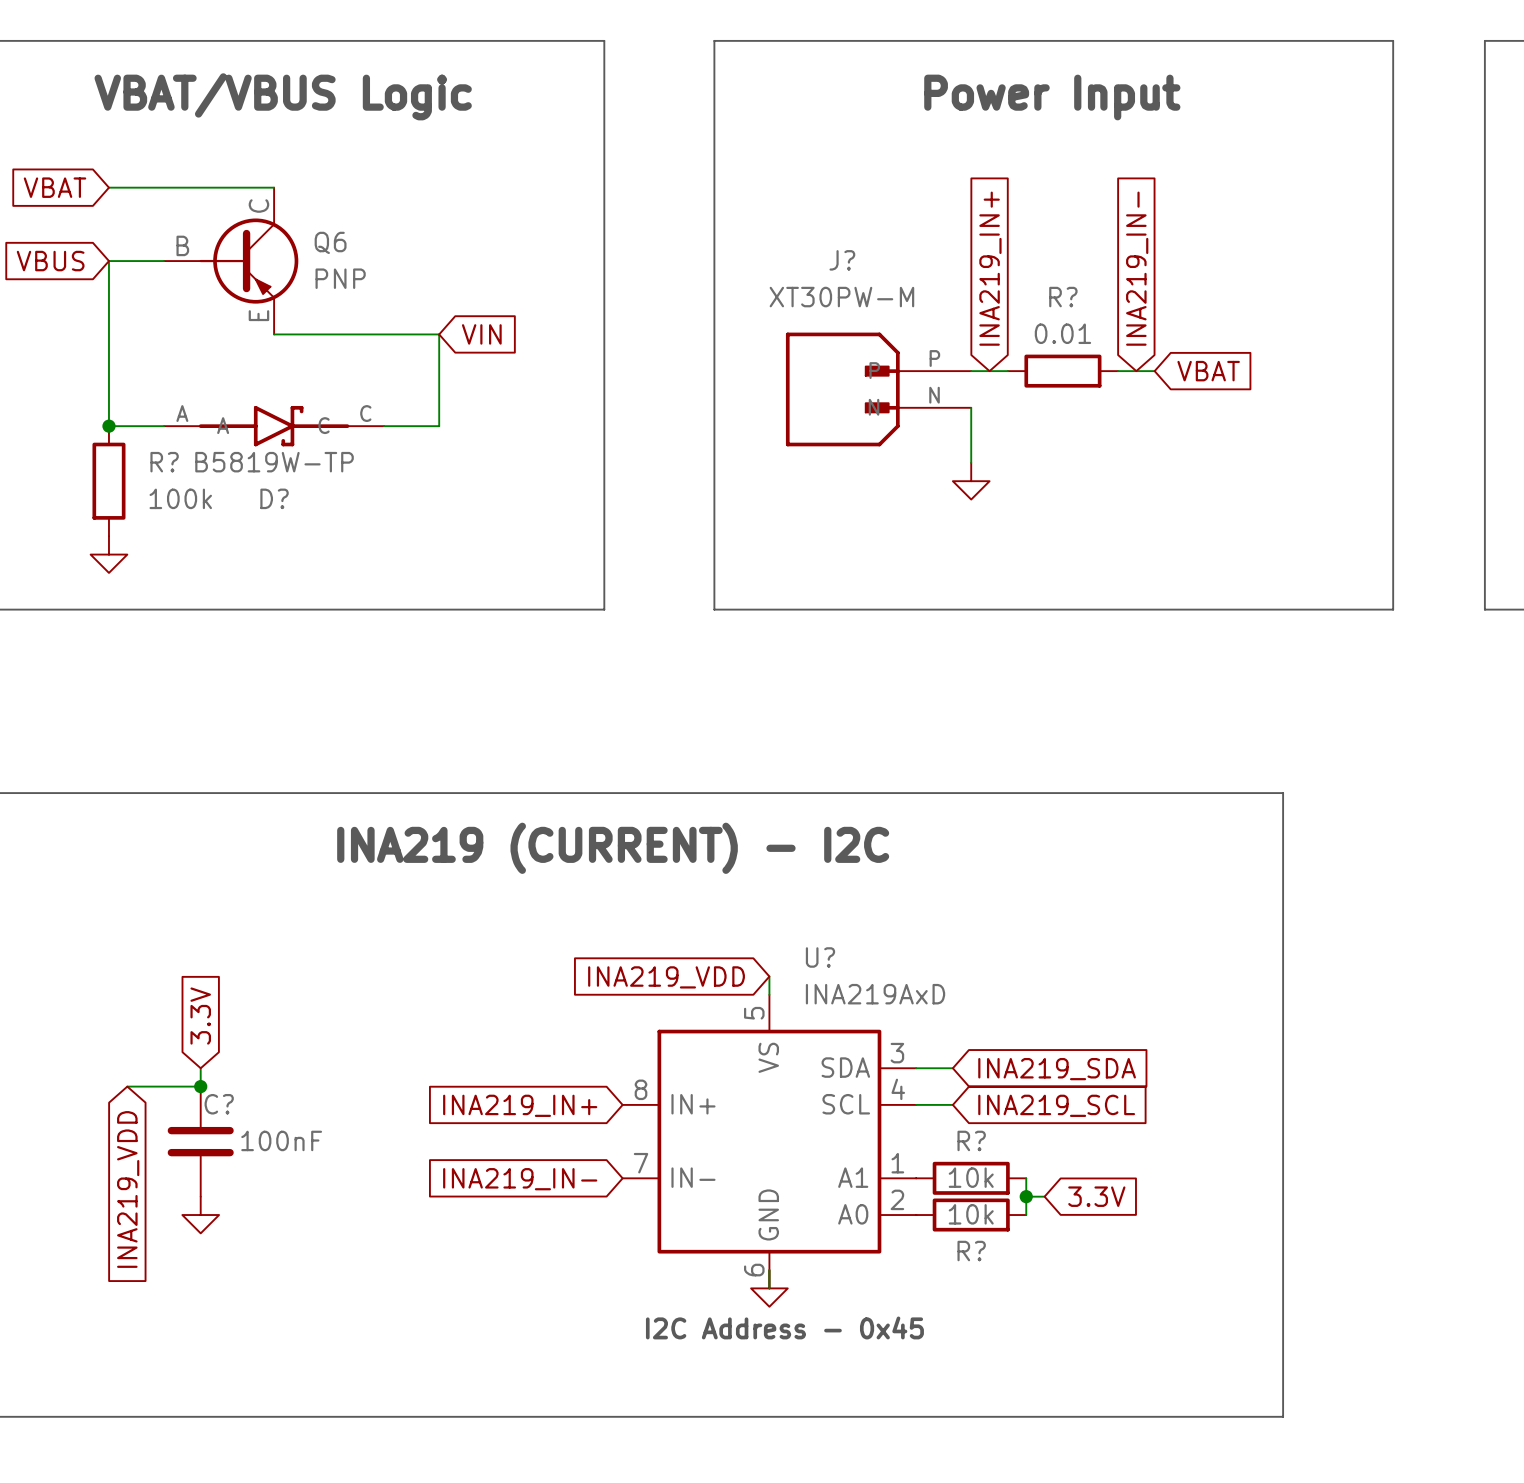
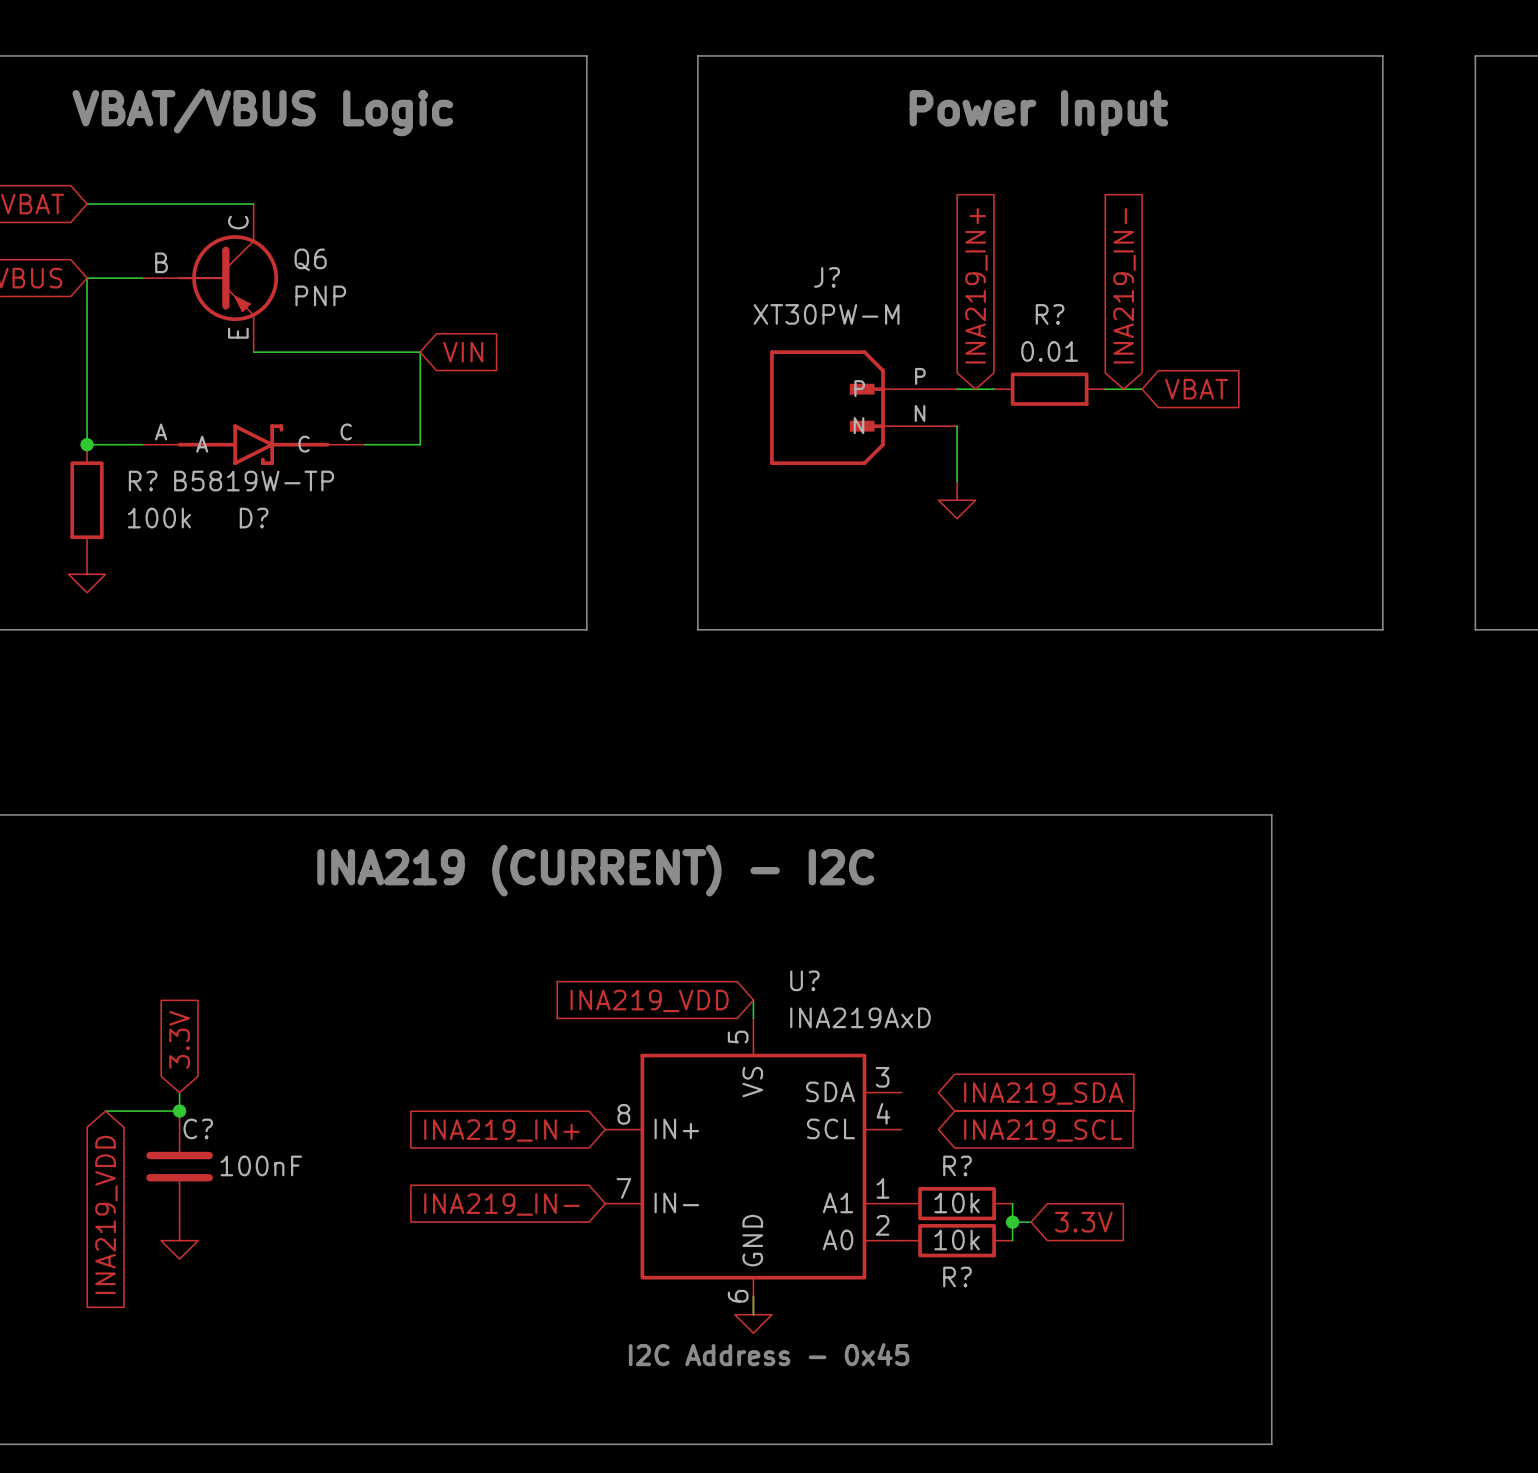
wire: (916, 1068) (952, 1068) -> none
wire: (916, 1104) (952, 1104) -> none

